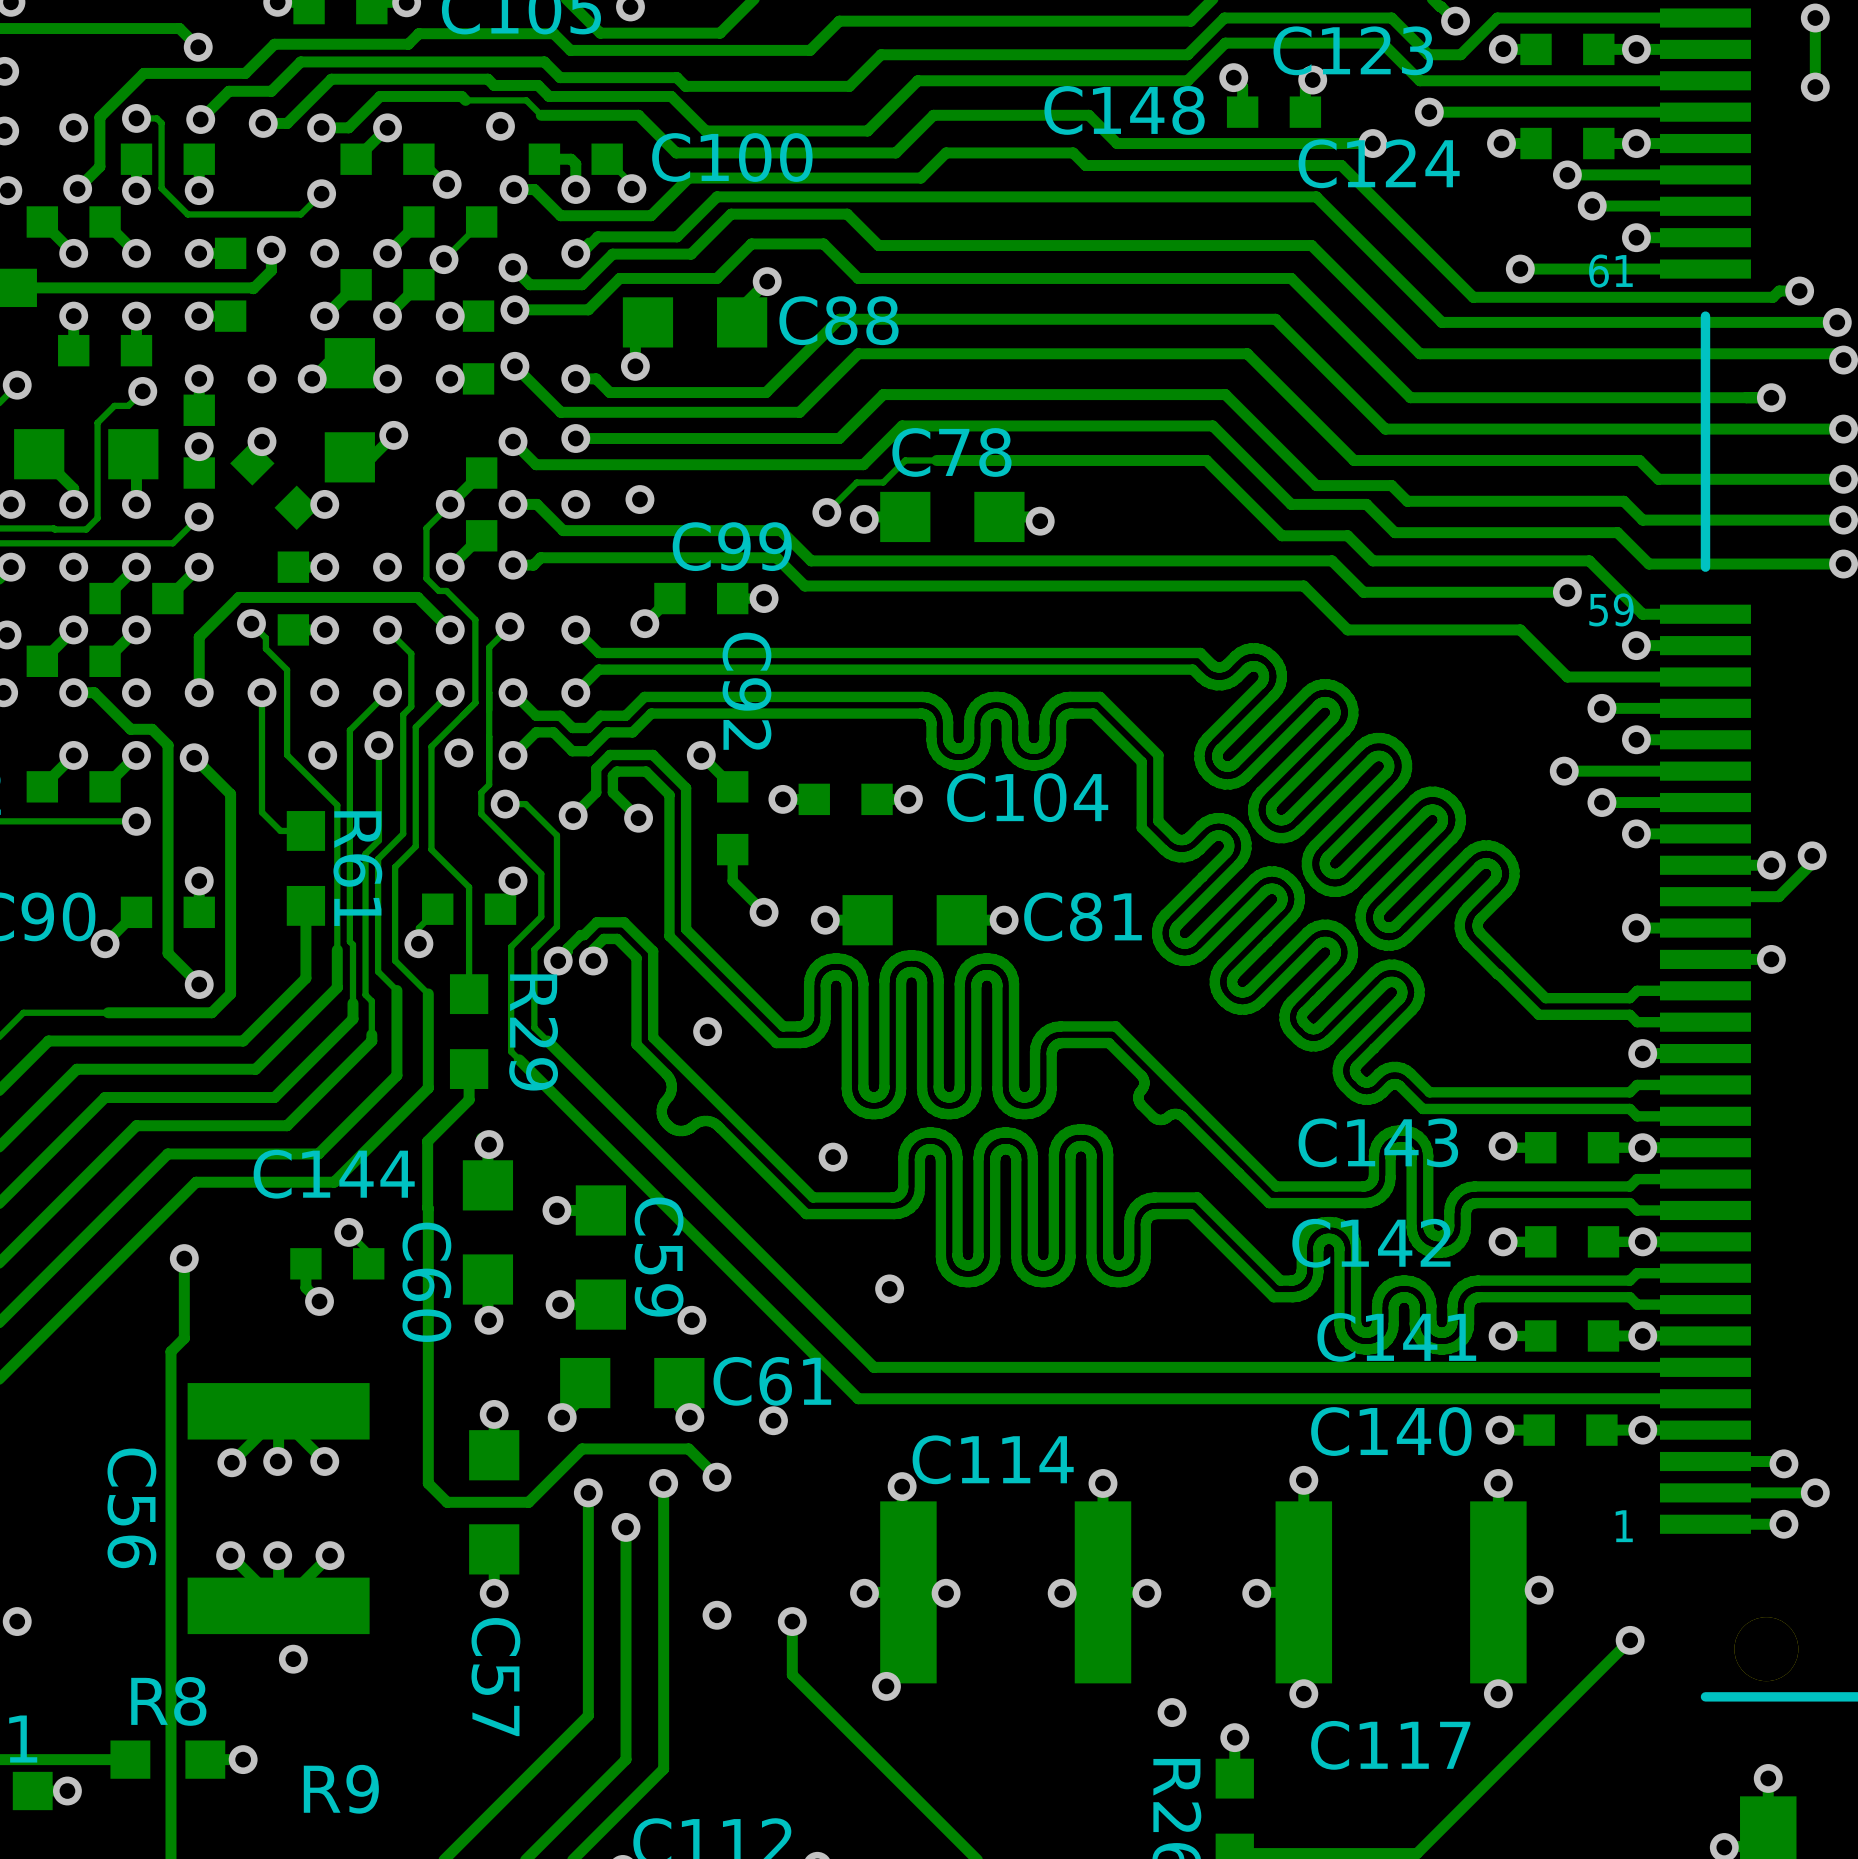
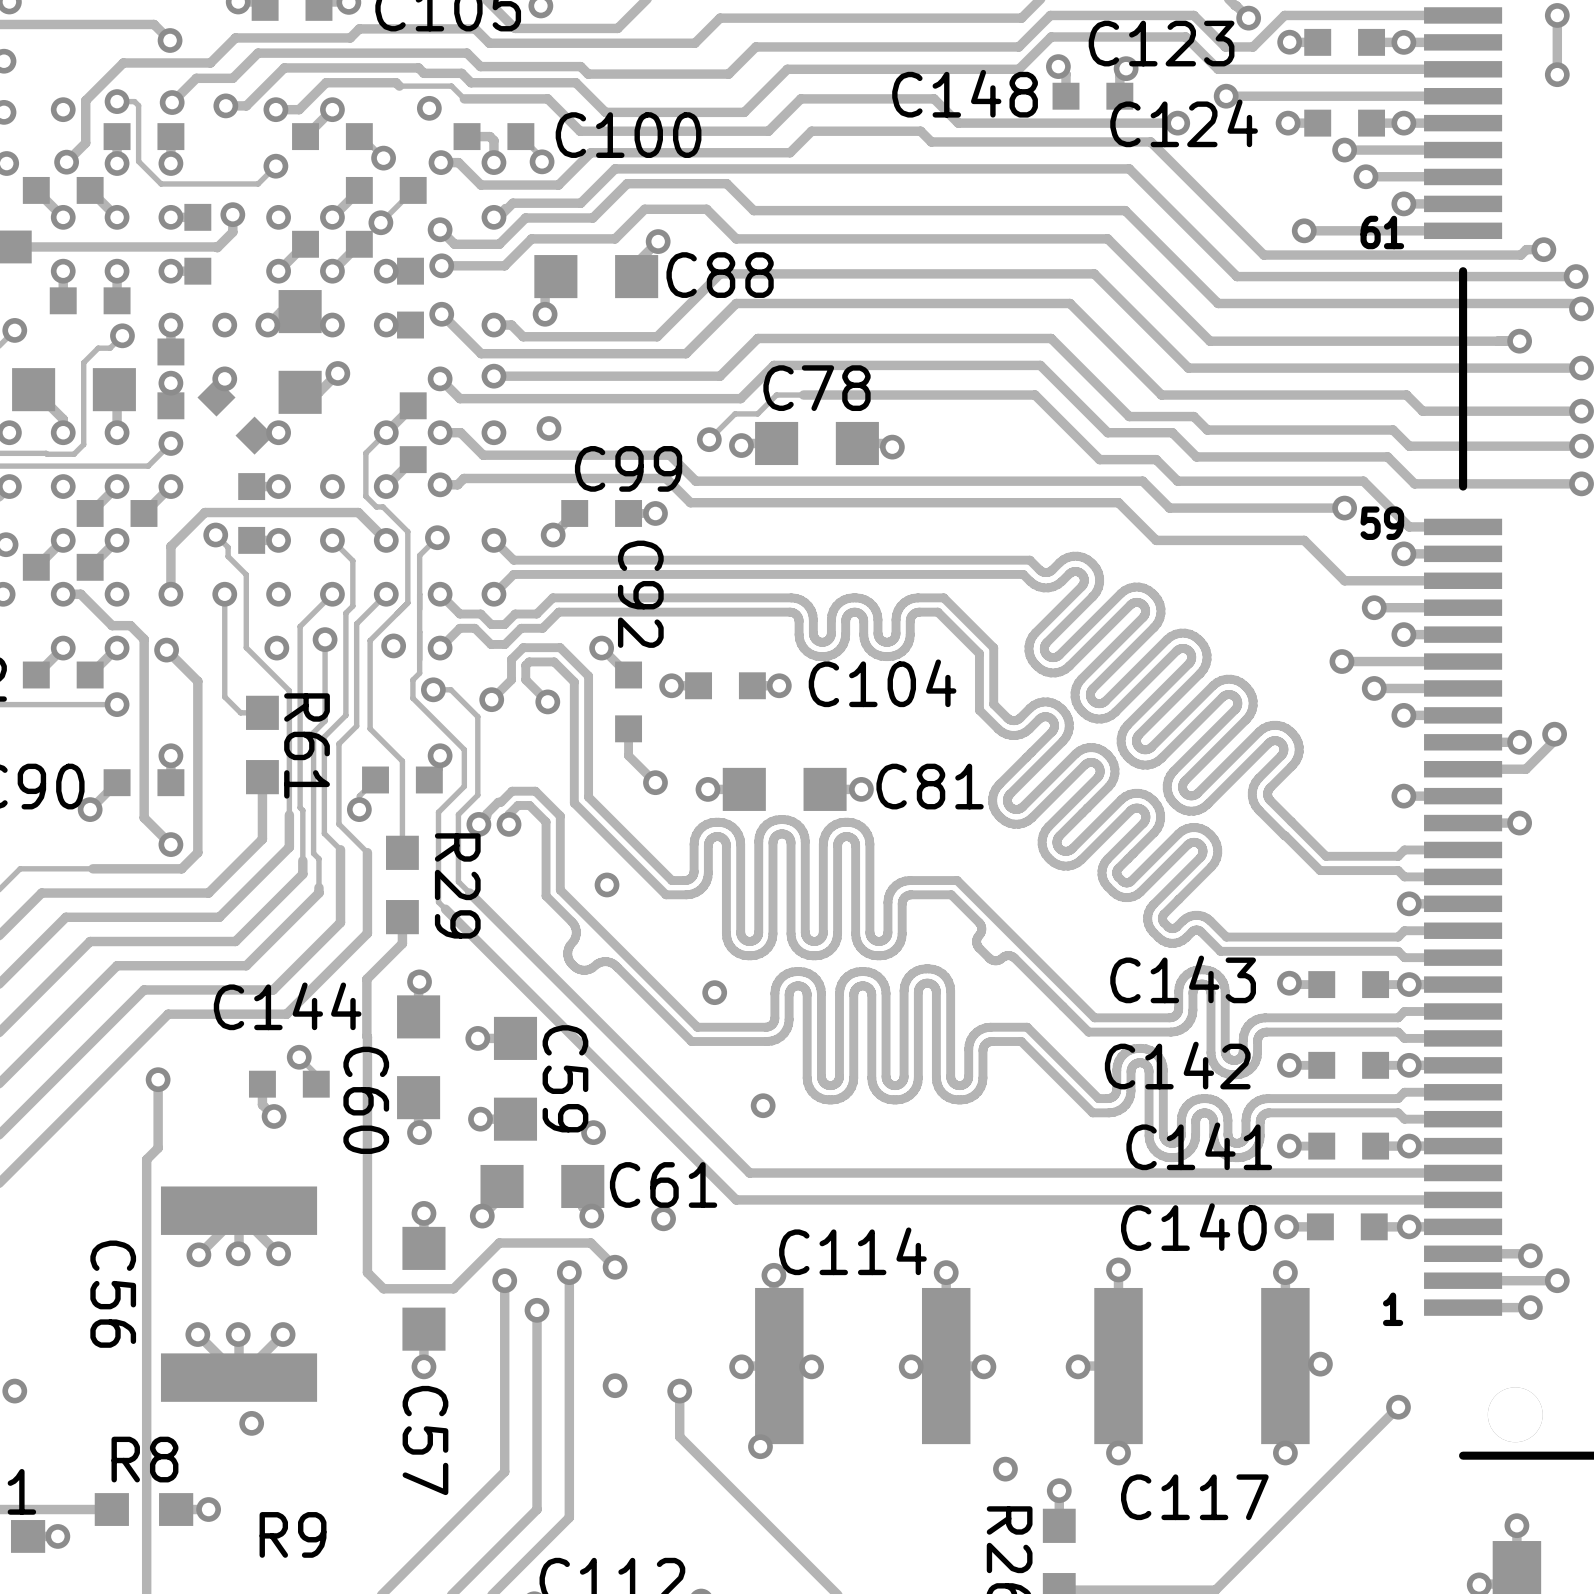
C124 name position: C124 (1379, 163) -> C124 (1184, 123)

